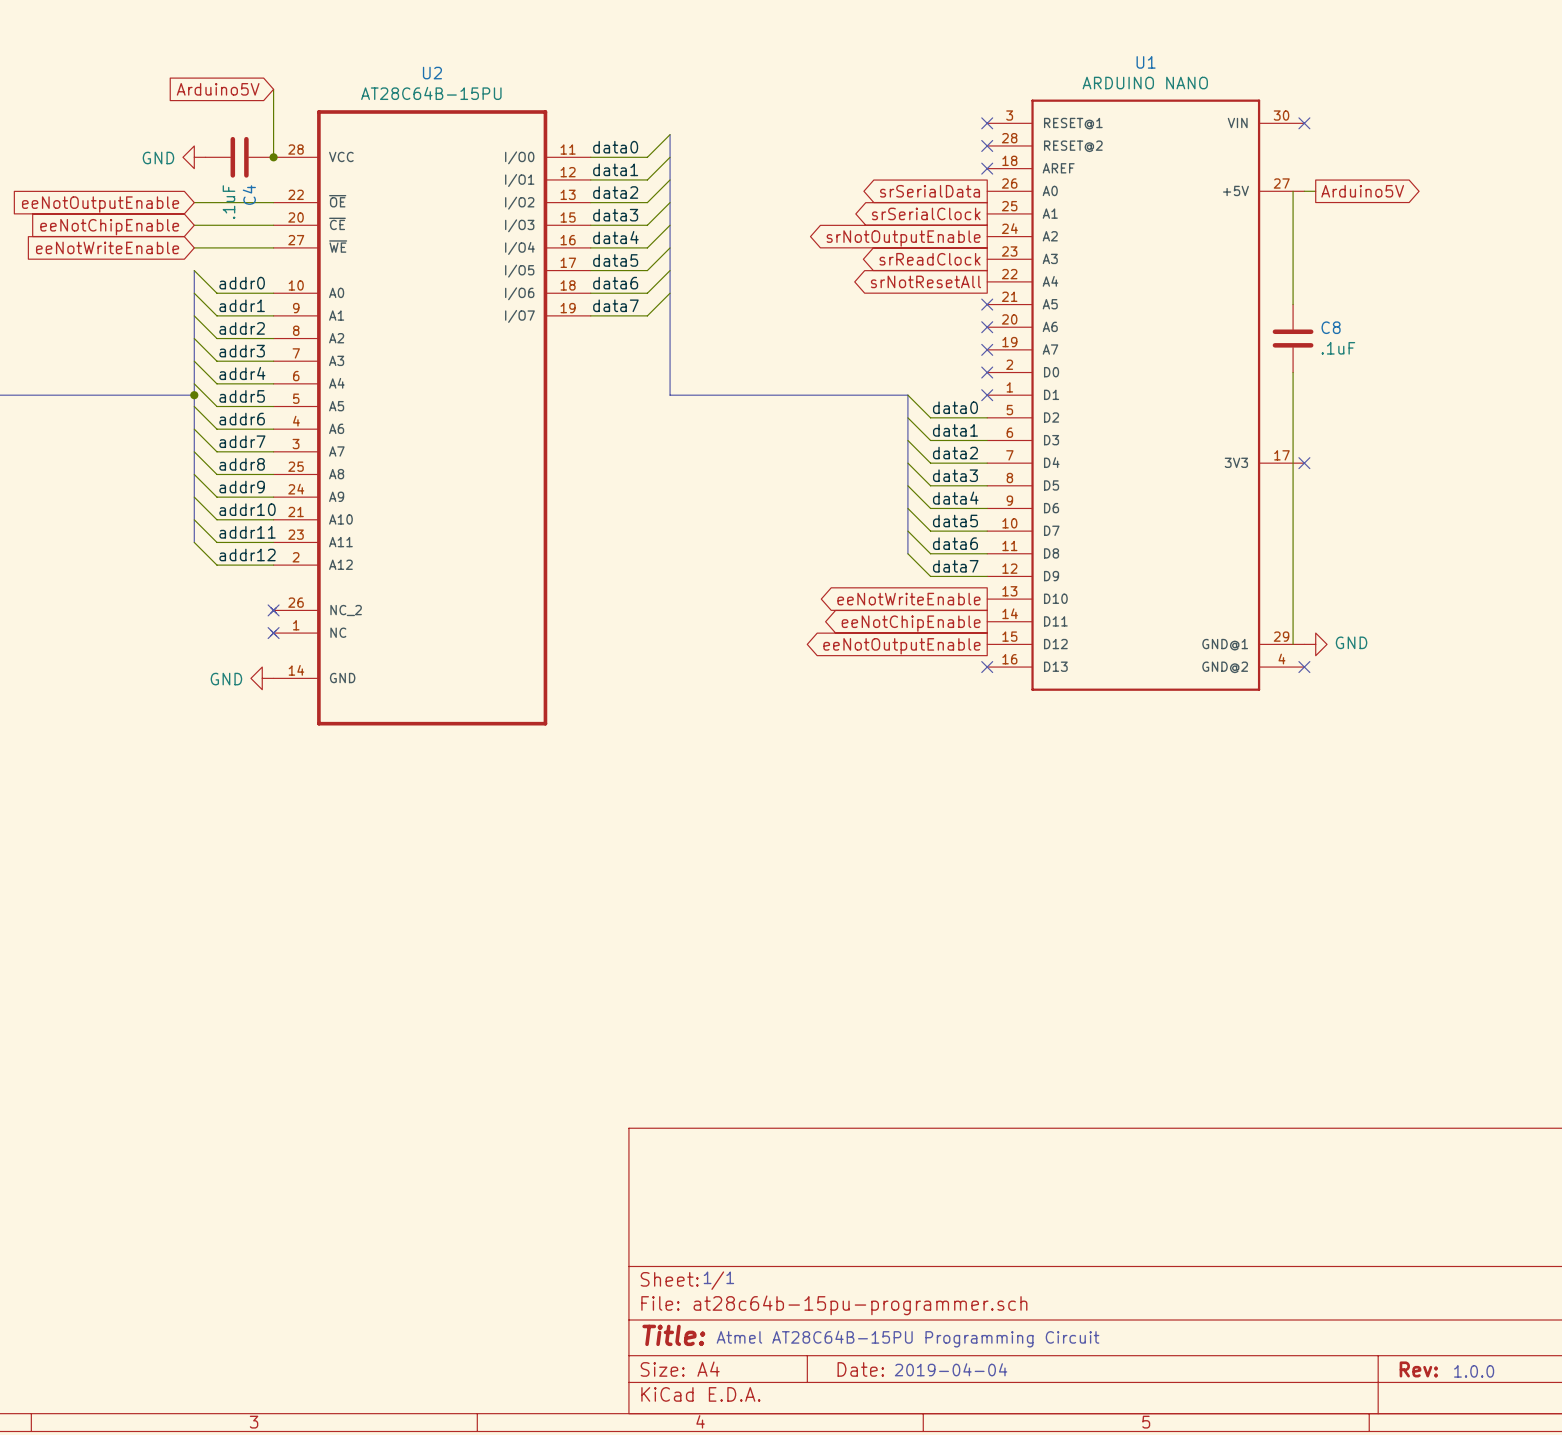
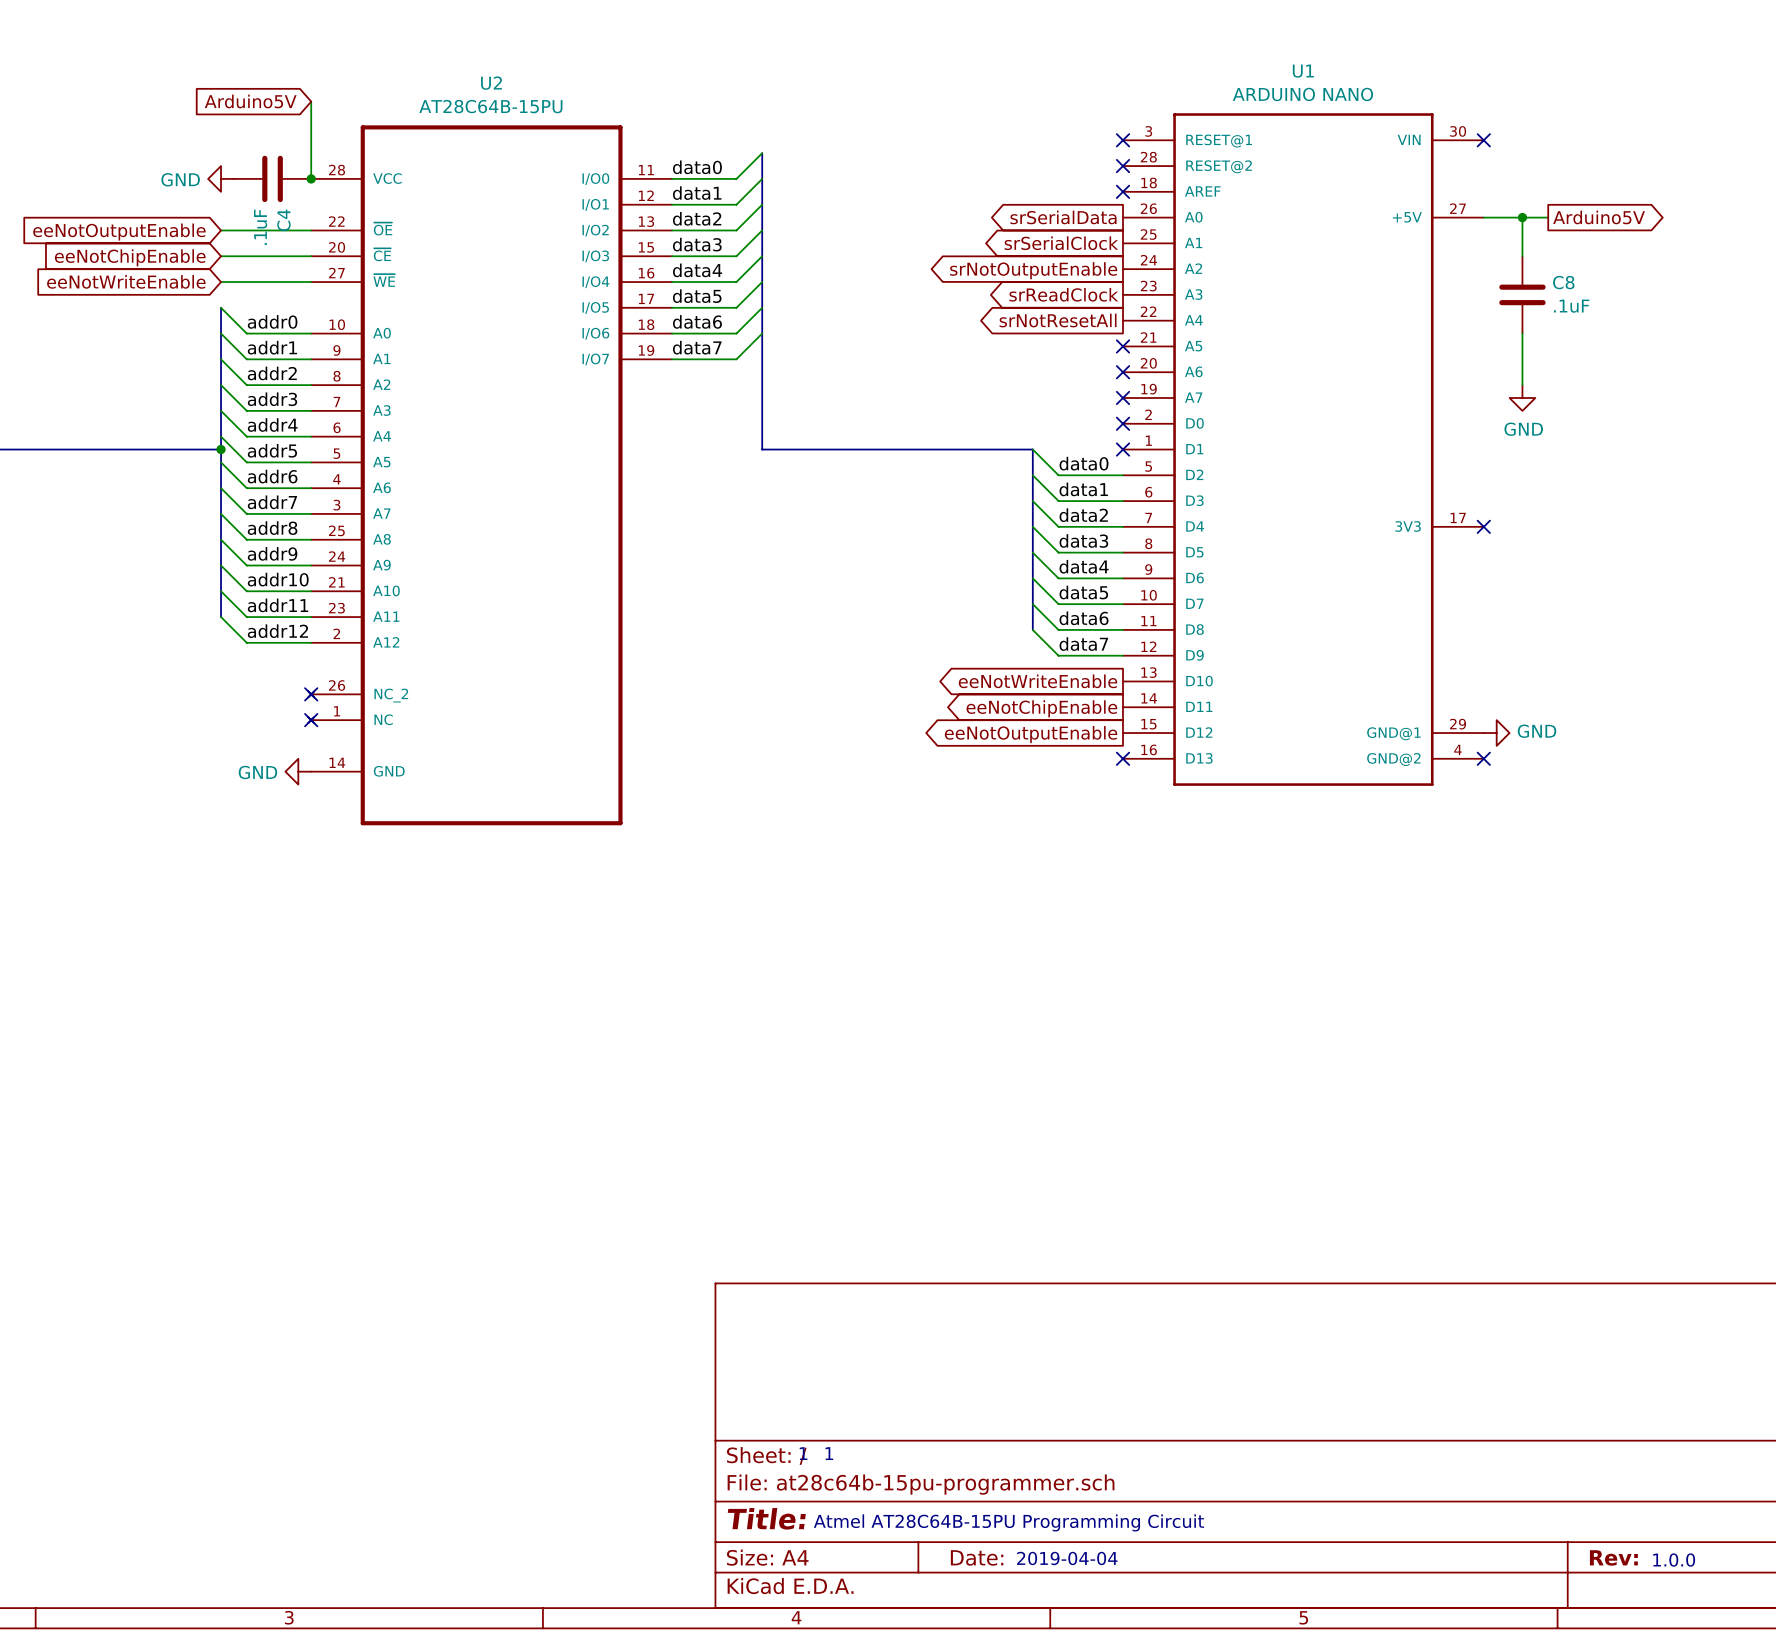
wire: (1293, 191) (1293, 304) -> none
wire: none -> (1496, 217) (1548, 217)
wire: none -> (1522, 217) (1522, 256)
junction: none -> (1522, 217)
global label position: Arduino5V (1362, 191) -> Arduino5V (1599, 217)
wire: none -> (1522, 333) (1522, 385)
C8 position: (1293, 338) -> (1522, 294)
power symbol: none -> GND (1522, 397)
wire: (1293, 372) (1293, 644) -> none

